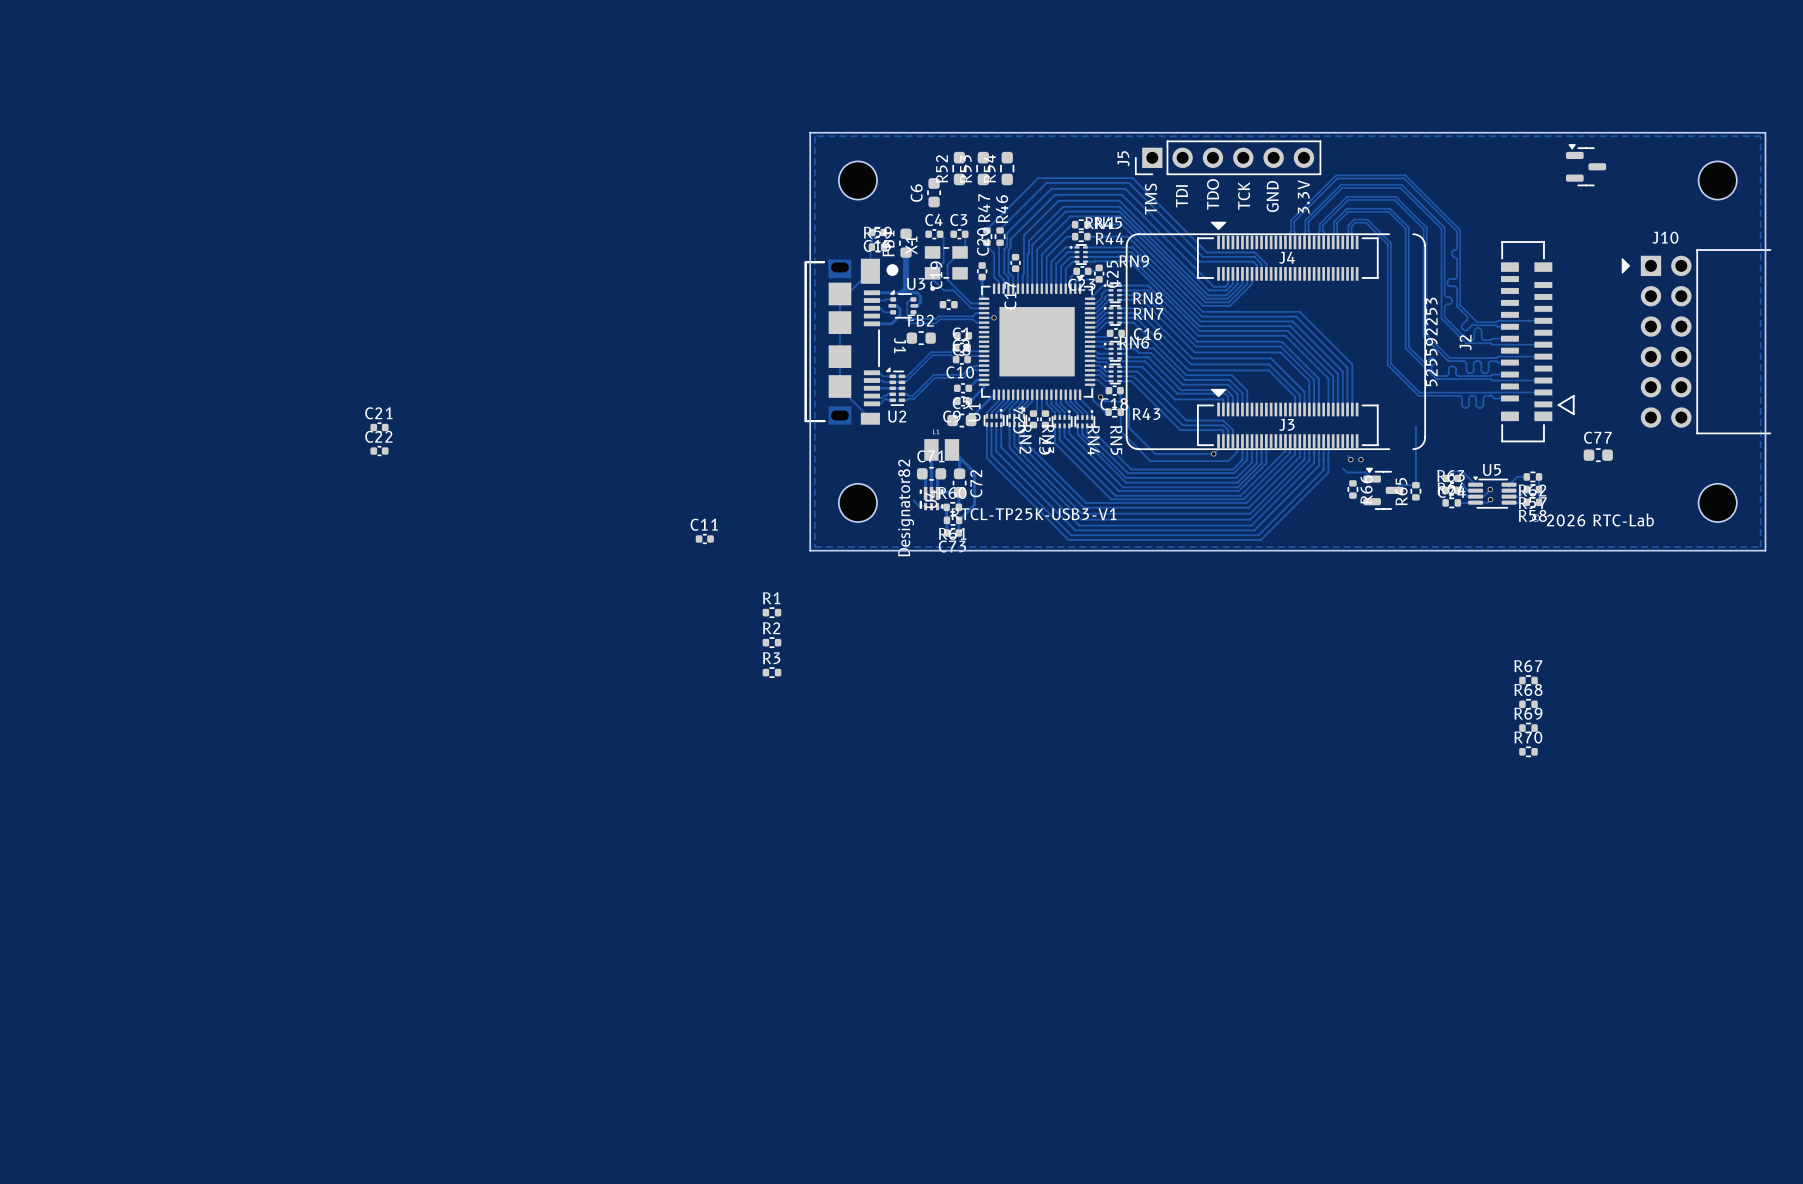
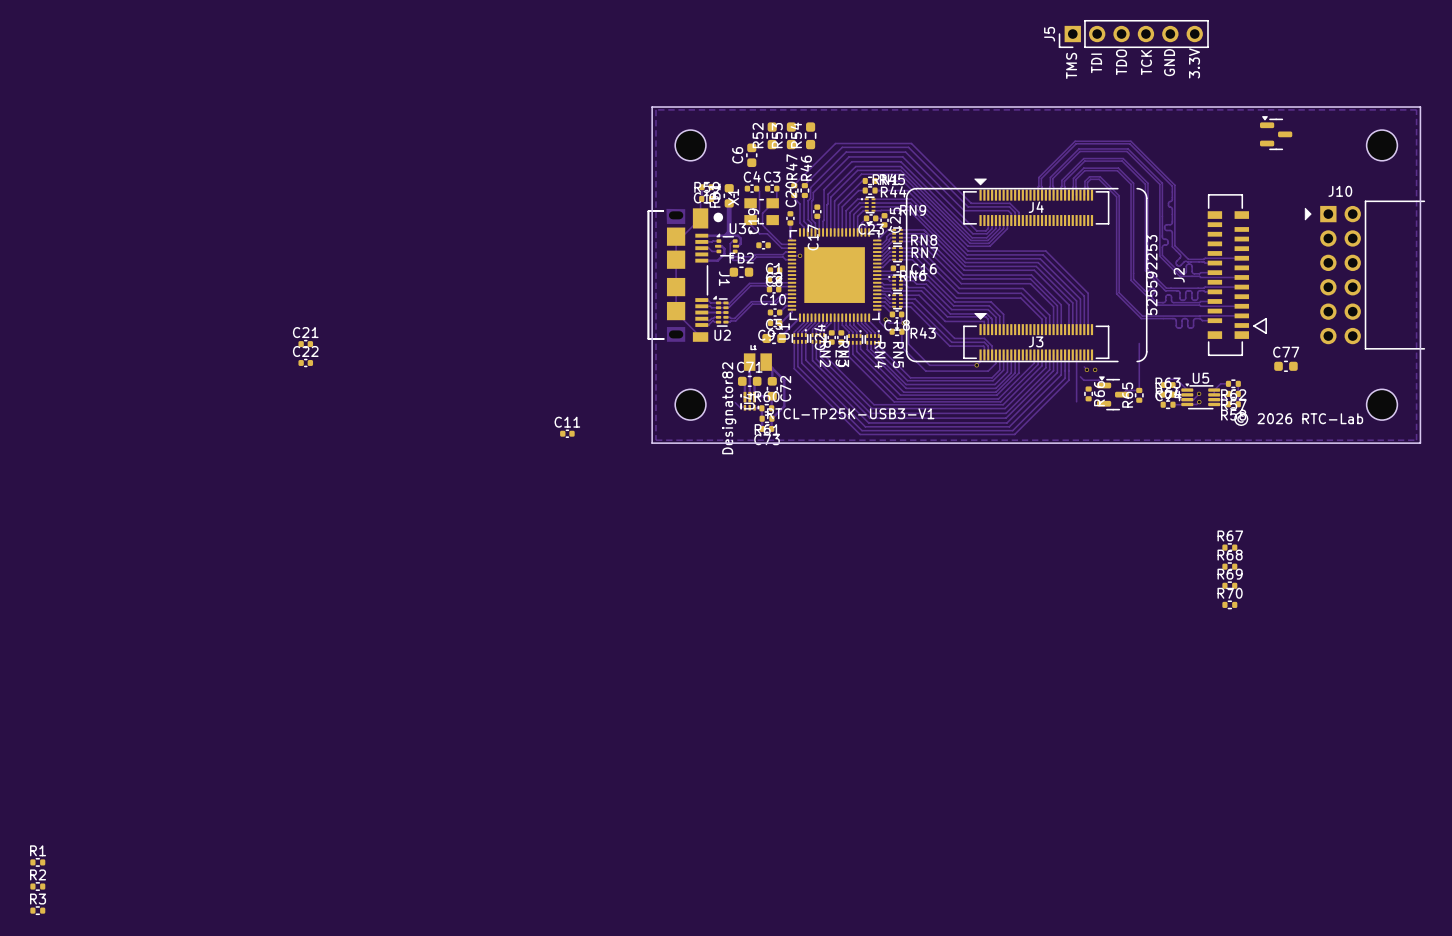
J5 position: (1228, 157) -> (1133, 34)
text position: TDO (1213, 194) -> TDO (1121, 62)
text position: TCK (1244, 195) -> TCK (1146, 62)
text position: TDI (1181, 196) -> TDI (1096, 63)
text position: GND (1272, 196) -> GND (1169, 62)
text position: 3.3V (1303, 196) -> 3.3V (1194, 63)
text position: TMS (1150, 199) -> TMS (1071, 65)
track: none -> (1076, 354) (1076, 401)
R1 position: (771, 612) -> (37, 862)
R2 position: (771, 642) -> (37, 886)
R3 position: (771, 672) -> (37, 910)

